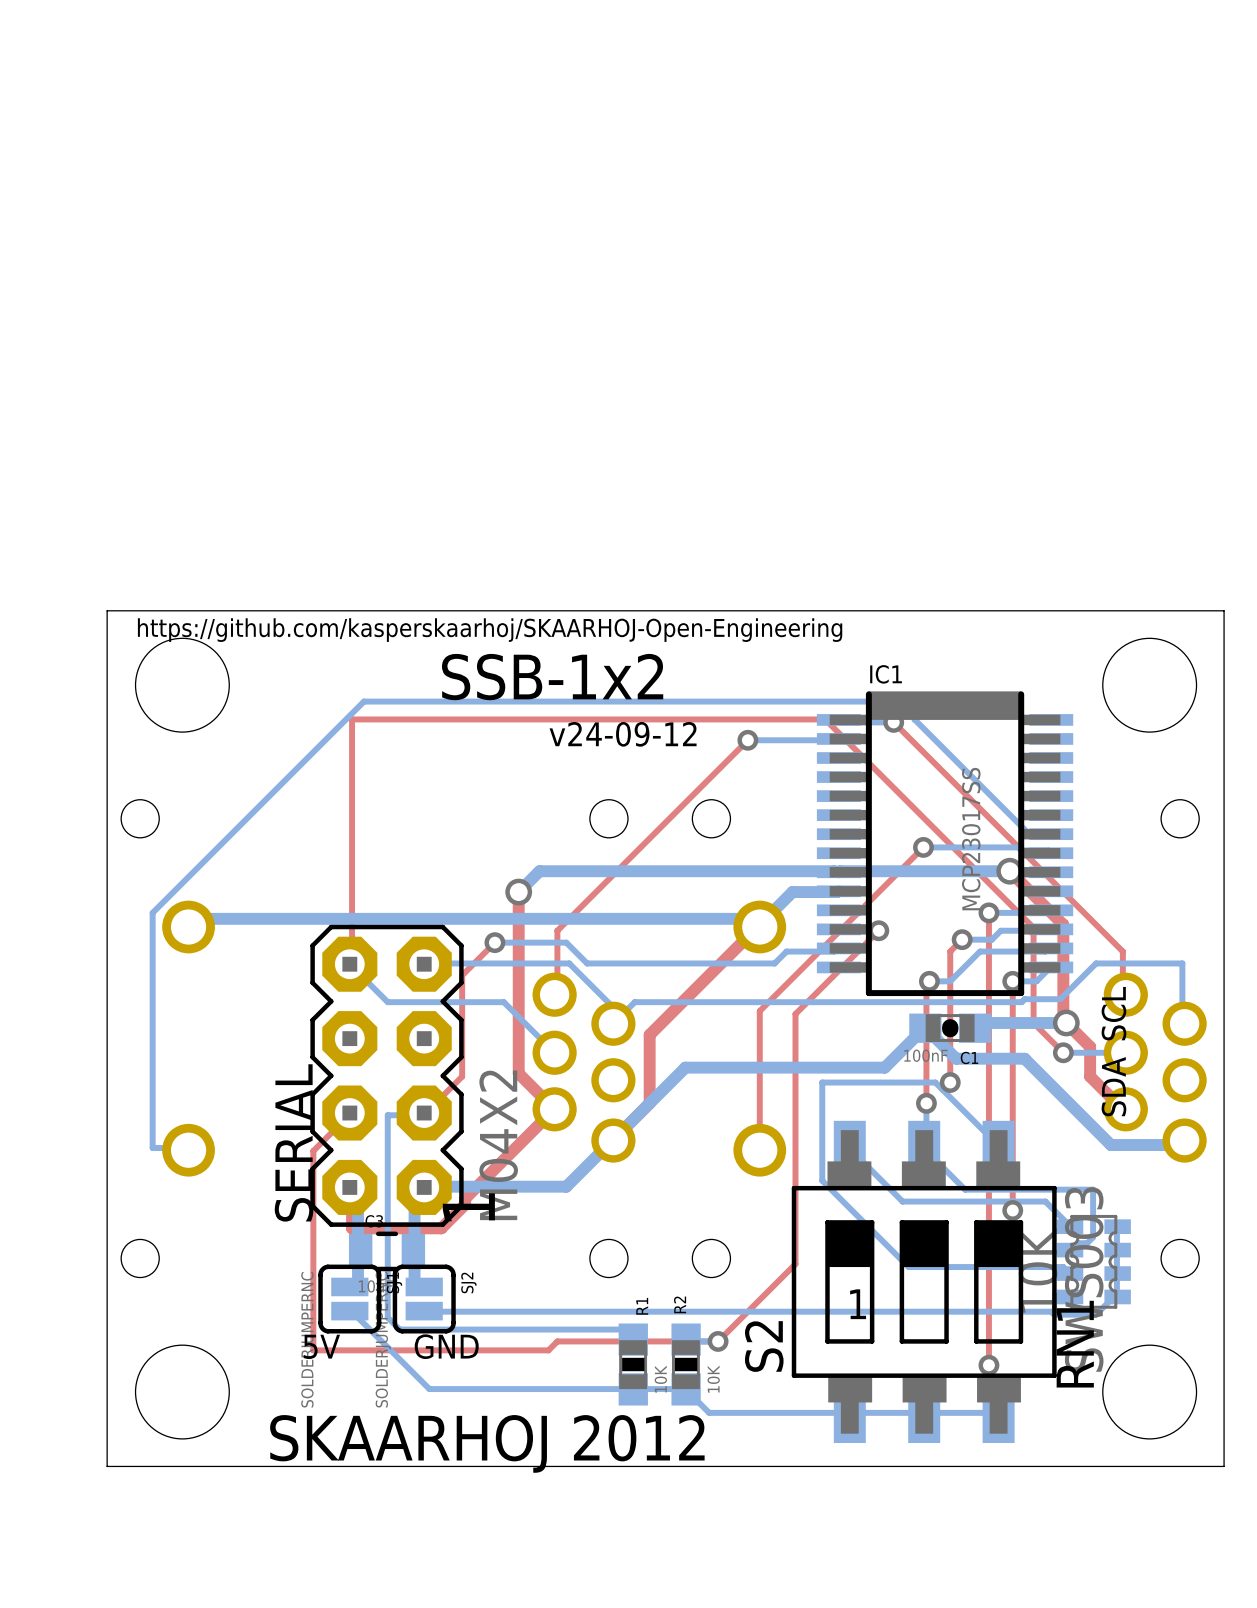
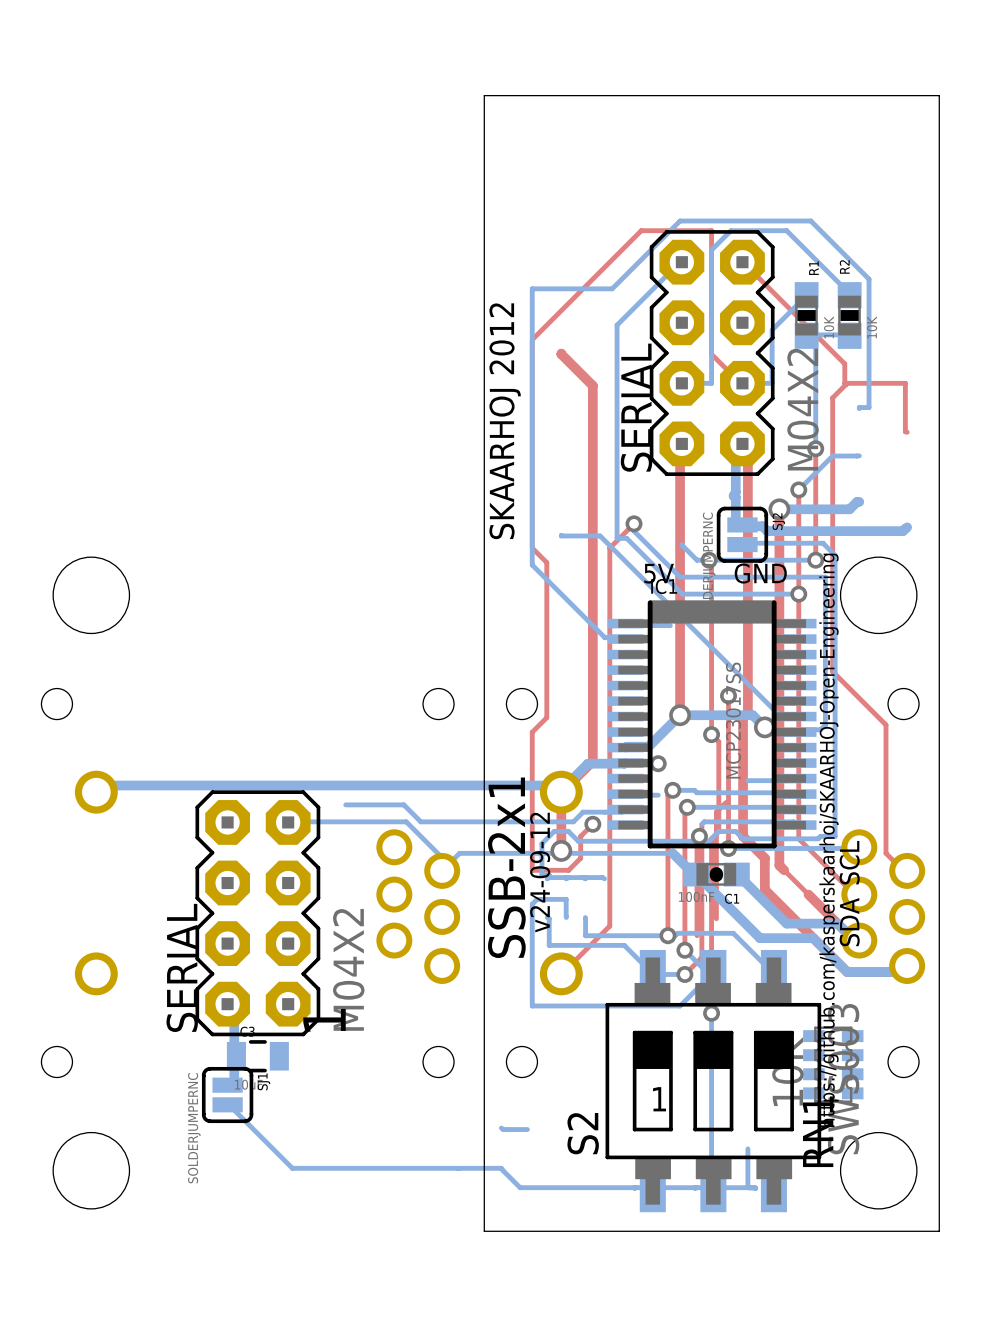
bottom track: none -> (681, 262) (617, 325) (617, 538) (626, 538) (682, 594) (798, 594)
top track: none -> (742, 262) (844, 363) (846, 384)
bottom track: none -> (806, 295) (772, 330) (772, 383) (742, 383)
bottom track: none -> (849, 295) (786, 230) (730, 230) (711, 250) (711, 383) (681, 383)
bottom track: none -> (849, 335) (849, 334) (808, 334) (806, 335) (815, 334) (815, 448)
SERIAL: none -> M04X2 (712, 353)
top track: none -> (561, 353) (592, 385) (592, 761) (561, 792) (561, 850)
top track: none -> (742, 383) (711, 354) (711, 230) (641, 230) (532, 339) (532, 548) (546, 562) (546, 717) (532, 732) (532, 870) (568, 870) (580, 858) (580, 836) (592, 824)
text: none -> SKAARHOJ 2012 (505, 421)
top track: none -> (907, 432) (905, 431) (905, 383) (847, 383) (832, 397) (832, 671) (885, 724) (885, 853) (907, 873)
top track: none -> (681, 443) (680, 443) (680, 715)
bottom track: none -> (742, 443) (735, 443) (735, 492) (733, 495) (735, 497) (735, 523) (745, 526) (762, 526) (767, 531) (902, 531) (907, 527)
top track: none -> (742, 443) (747, 448) (747, 712) (743, 717) (743, 836) (764, 858) (764, 889) (847, 972) (905, 972) (907, 968)
top track: none -> (815, 448) (815, 560)
via: none -> (815, 448)
bottom track: none -> (859, 455) (832, 456) (798, 489)
top track: none -> (798, 489) (798, 838) (856, 896) (859, 897)
via: none -> (798, 489)
bottom track: none -> (859, 501) (849, 509) (779, 509)
via: none -> (779, 509)
top track: none -> (634, 523) (609, 548) (609, 926) (561, 976)
via: none -> (634, 523)
board edge: (1224, 610) (107, 610) (107, 1466) (665, 1466) -> (939, 534) (939, 95) (484, 95) (484, 1231)
bottom track: none -> (681, 544) (697, 560) (815, 560)
text: https://github.com/kasperskaarhoj/SKAARHOJ-Open-Engineering (490, 630) -> none
top track: none -> (709, 560) (711, 562) (711, 734) (718, 741) (718, 831) (711, 838) (711, 1013)
via: none -> (709, 560)
via: none -> (815, 560)
text: none -> 5V (659, 573)
text: none -> GND (760, 573)
text: SSB-1x2 (552, 677) -> none
via: none -> (798, 594)
bottom track: (914, 719) (914, 701) (363, 701) (152, 912) (152, 1148) (188, 1148) (188, 1150) -> (687, 623) (600, 535) (561, 535)
top track: (893, 722) (1122, 951) (1122, 993) (1125, 994) -> none
via: (893, 722) -> none
text rotation: 0° (623, 734) -> 90° counterclockwise (540, 872)
text position: v24-09-12 (623, 734) -> v24-09-12 (540, 872)
bottom track: (838, 738) (747, 740) -> (625, 639) (604, 637) (532, 565) (532, 288) (612, 288) (680, 221) (810, 221) (869, 279) (869, 407) (859, 408)
top track: (747, 740) (557, 930) (557, 993) (554, 994) -> none
via: (747, 740) -> none
top track: none -> (728, 695) (728, 848)
via: none -> (728, 695)
via: none -> (680, 715)
bottom track: (923, 847) (1018, 847) (1021, 850) (1048, 850) (1051, 853) -> (634, 523) (634, 531) (680, 577) (825, 577) (825, 724) (820, 729) (798, 729) (798, 732)
top track: (923, 847) (759, 1011) (759, 1150) -> none
via position: (923, 847) -> (711, 734)
bottom track: (1009, 871) (866, 871) -> (764, 727) (752, 715) (680, 715) (648, 746)
top track: (1009, 871) (1063, 924) (1063, 1020) (1090, 1046) (1090, 1076) (1122, 1109) (1125, 1109) -> none
via position: (1009, 871) -> (764, 727)
bottom track: (838, 872) (539, 871) (518, 892) -> none
top track: (518, 892) (518, 1073) (554, 1109) -> none
via: (518, 892) -> none
via: none -> (658, 763)
top track: (988, 912) (988, 1365) -> none
via: (988, 912) -> none
top track: none -> (672, 790) (667, 795) (667, 935)
top track: (759, 927) (756, 927) (649, 1034) (649, 1103) (613, 1140) -> none
bottom track: (1051, 929) (1000, 930) (991, 939) (962, 939) -> (798, 794) (697, 792) (694, 790) (672, 790)
top track: (878, 930) (795, 1014) (795, 1264) (718, 1341) (557, 1341) (548, 1350) (313, 1350) (313, 1150) (349, 1113) -> none
via position: (878, 930) -> (672, 790)
via: (962, 939) -> none
top track: (494, 942) (462, 975) (462, 1076) (424, 1113) -> none
via: (494, 942) -> none
top track: none -> (687, 807) (684, 809) (684, 950)
via: none -> (687, 807)
bottom track: (1051, 948) (1045, 951) (980, 951) (950, 981) (929, 981) -> (798, 809) (796, 807) (687, 807)
bottom track: (349, 964) (387, 1002) (503, 1002) (554, 1052) -> none
top track: (349, 964) (352, 963) (352, 719) (825, 719) (1033, 927) (1033, 1023) -> (779, 509) (779, 865) (784, 870)
via: none -> (592, 824)
top track: none -> (701, 824) (701, 957) (684, 974)
bottom track: (1051, 967) (1036, 981) (1012, 981) -> (798, 825) (793, 821) (704, 821) (701, 824)
top track: (1012, 981) (1012, 1210) -> none
via: (1012, 981) -> none
bottom track: (1078, 981) (1096, 963) (1182, 963) (1182, 1023) (1184, 1023) -> (820, 836) (835, 836) (835, 555) (823, 543) (742, 544)
bottom track: (1075, 984) (1060, 999) (1024, 999) (1021, 1002) (896, 1002) -> (818, 838) (743, 838) (735, 831) (718, 831) (709, 841) (578, 841) (568, 831) (554, 831) (541, 843) (541, 875) (549, 875) (547, 878) (604, 878)
text: none -> https://github.com/kasperskaarhoj/SKAARHOJ-Open-Engineering (829, 840)
bottom track: none -> (728, 848) (859, 849)
via: none -> (728, 848)
via: none -> (561, 850)
text: none -> SSB-2x1 (506, 867)
bottom track: (1066, 1023) (980, 1023) (975, 1028) -> (859, 943) (856, 942) (837, 923) (786, 923) (736, 874)
via: (1066, 1023) -> none
bottom track: (925, 1028) (884, 1067) (685, 1067) (566, 1186) (429, 1186) (424, 1187) (423, 1189) (414, 1189) (414, 1284) (423, 1284) (424, 1286) -> (696, 874) (672, 853)
top track: none -> (808, 894) (856, 942) (859, 943)
via: (1063, 1052) -> none
bottom track: (1125, 1052) (1063, 1052) -> none
bottom track: (956, 1058) (1024, 1058) (1110, 1145) (1179, 1145) (1184, 1140) -> (721, 899) (760, 938) (813, 938) (847, 972) (902, 972) (907, 968)
bottom track: none -> (547, 917) (549, 918) (549, 945) (624, 945) (653, 974) (684, 974)
bottom track: none -> (566, 917) (566, 899) (537, 899) (532, 904) (532, 1005) (680, 1005) (713, 973) (709, 974) (684, 950)
bottom track: none -> (585, 917) (585, 935) (733, 933) (773, 973)
via: (950, 1082) -> none
via: none -> (667, 935)
bottom track: (926, 1103) (926, 1148) (924, 1150) (965, 1189) (1093, 1189) (1093, 1237) (1087, 1243) (1078, 1243) (1070, 1250) -> none
via position: (926, 1103) -> (684, 950)
top track: (554, 1109) (465, 1198) (465, 1204) (441, 1228) (352, 1228) (352, 1189) (349, 1187) -> none
bottom track: (424, 1113) (423, 1115) (387, 1115) (387, 1317) (399, 1329) (622, 1329) (633, 1339) -> none
bottom track: (849, 1150) (902, 1201) (1045, 1201) (1070, 1226) -> none
via: none -> (684, 974)
bottom track: (998, 1150) (1000, 1148) (935, 1082) (822, 1082) (822, 1180) (908, 1267) (1063, 1267) (1070, 1273) -> none
bottom track: none -> (711, 1013) (711, 1185) (713, 1188)
via: none -> (711, 1013)
via: (1012, 1210) -> none
bottom track: (1117, 1226) (1117, 1296) (1113, 1296) (1096, 1314) (1054, 1314) (1051, 1311) (424, 1311) -> none
S2 position: (924, 1281) -> (713, 1081)
SJ2 position: (424, 1299) -> (742, 534)
via: (718, 1341) -> none
text: 5V (321, 1346) -> none
text: GND (446, 1346) -> none
R1 position: (633, 1364) -> (806, 315)
R2 position: (686, 1364) -> (849, 315)
via: (988, 1365) -> none
text: SKAARHOJ 2012 (487, 1443) -> none

